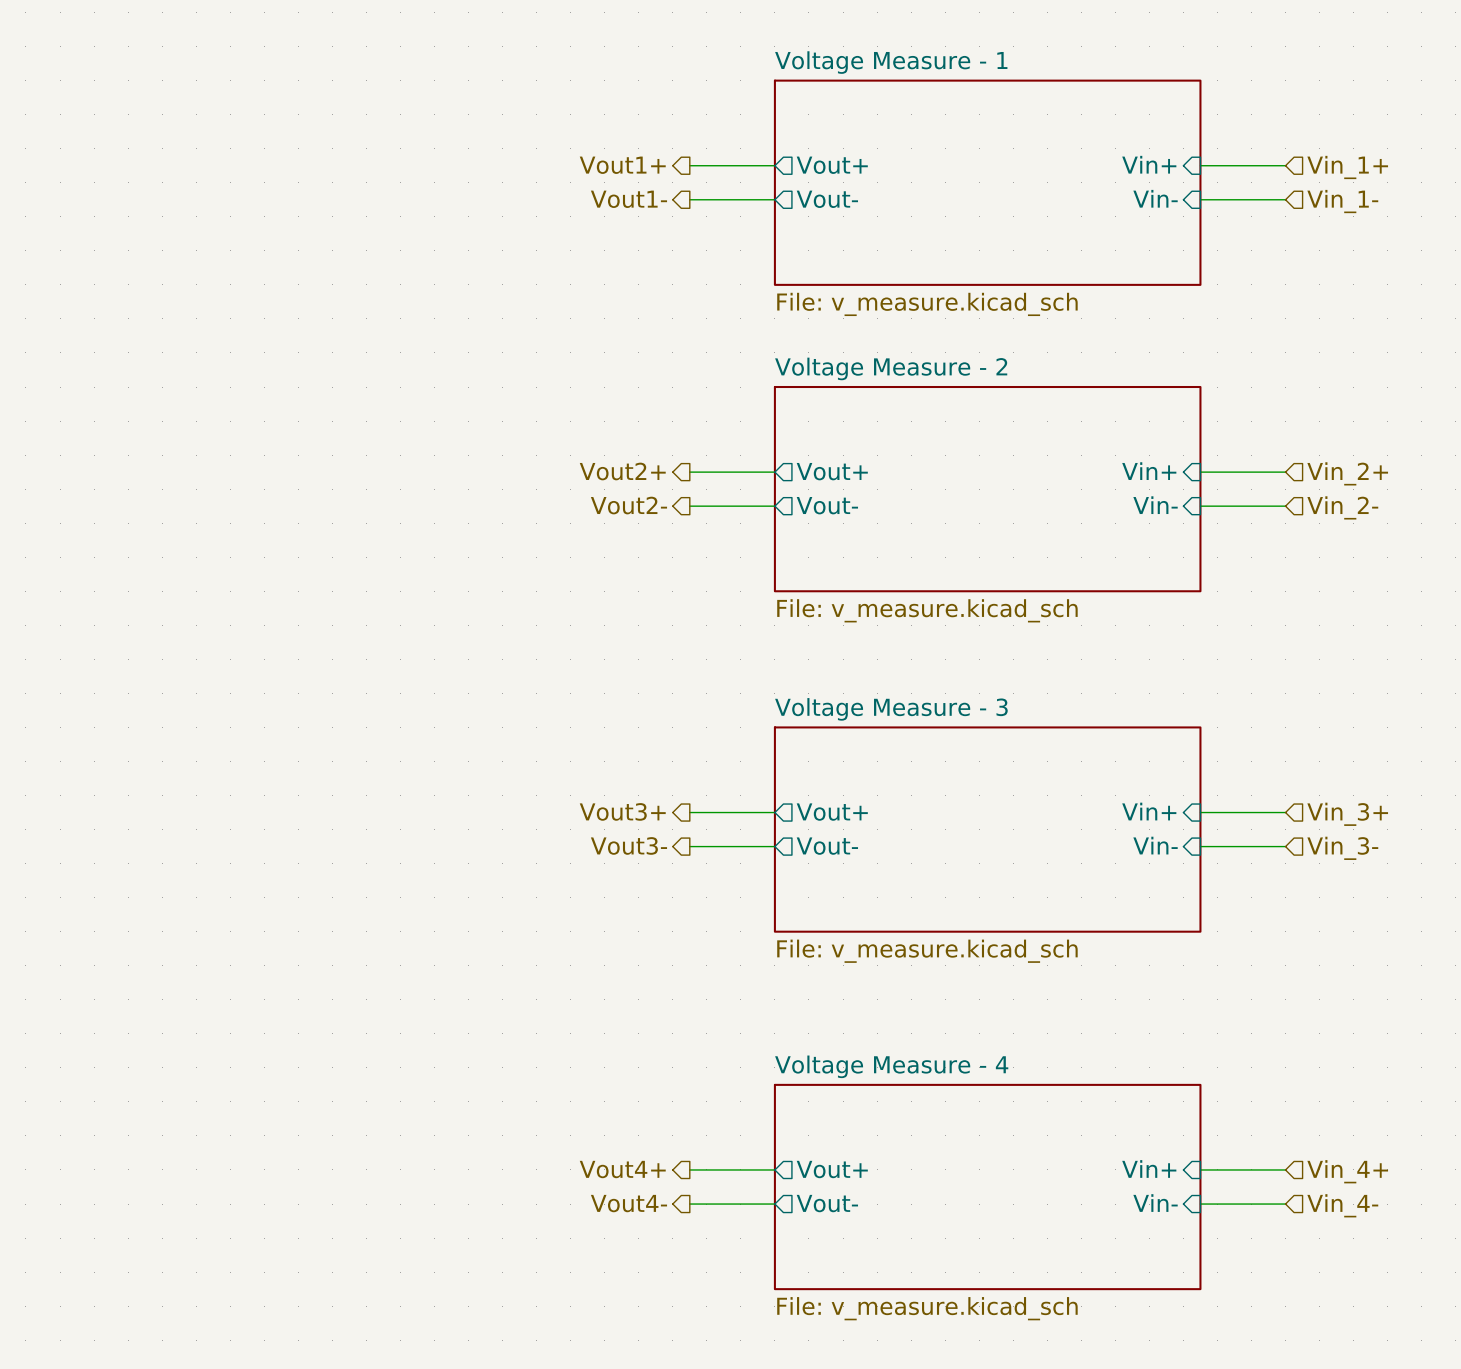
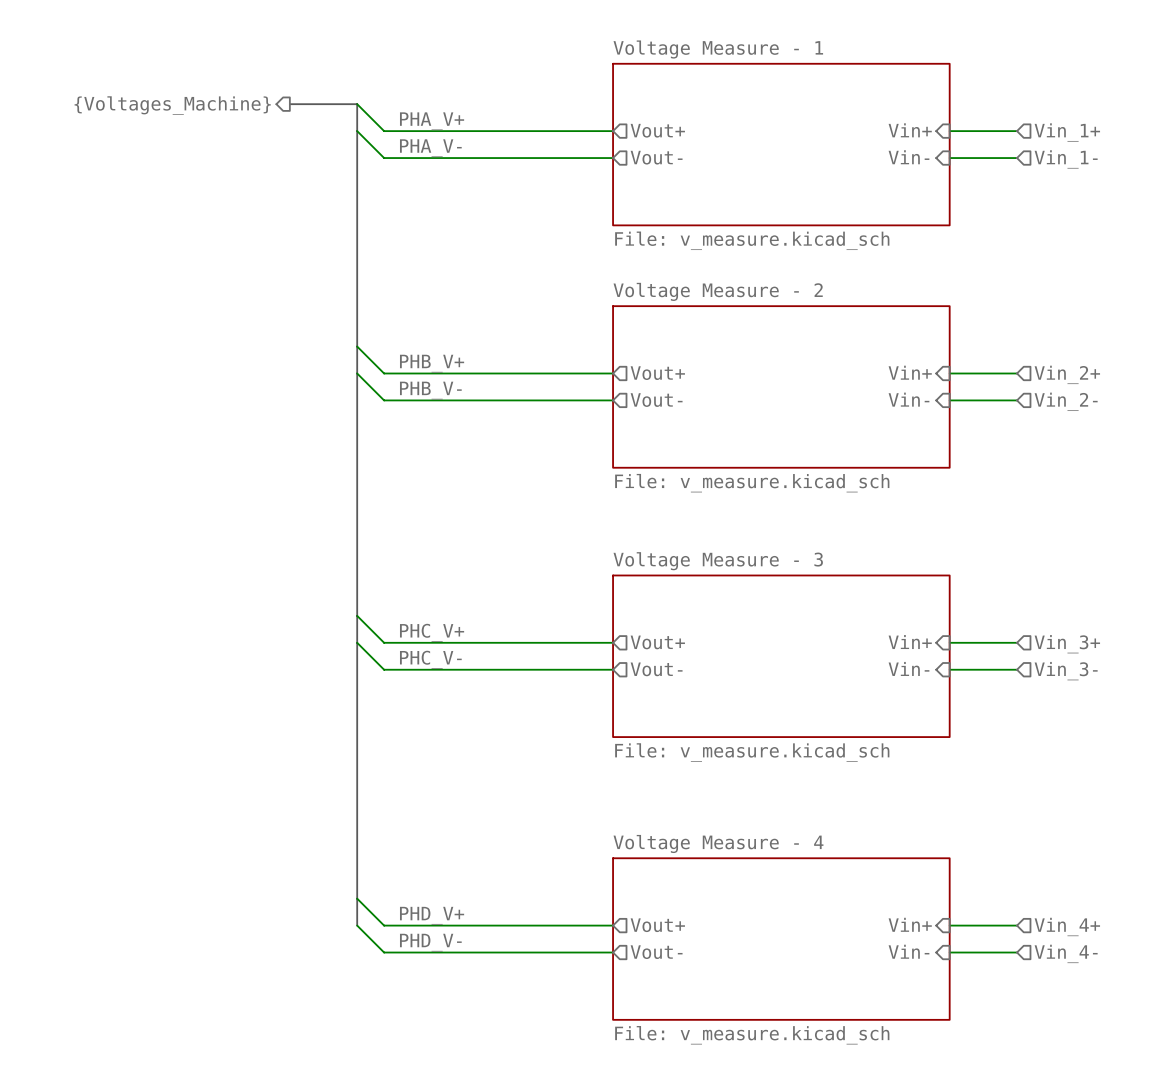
bus: none -> (289, 104) (357, 104) (357, 925)
wire: none -> (357, 104) (384, 131) (545, 131)
hierarchical label: none -> {Voltages_Machine} (172, 105)
label: none -> PHA_V+ (432, 121)
wire: none -> (357, 131) (384, 158) (545, 158)
hierarchical label: Vout1+ (622, 165) -> none
label: none -> PHA_V- (430, 148)
hierarchical label: Vout1- (628, 199) -> none
wire: none -> (357, 346) (384, 373) (545, 373)
label: none -> PHB_V+ (432, 363)
hierarchical label: Vout2+ (622, 471) -> none
wire: none -> (357, 373) (384, 400) (545, 400)
label: none -> PHB_V- (430, 390)
hierarchical label: Vout2- (628, 505) -> none
wire: none -> (357, 615) (384, 642) (545, 642)
label: none -> PHC_V+ (432, 632)
hierarchical label: Vout3+ (622, 811) -> none
wire: none -> (357, 642) (384, 669) (545, 669)
label: none -> PHC_V- (430, 659)
hierarchical label: Vout3- (628, 845) -> none
wire: none -> (357, 898) (384, 925) (545, 925)
label: none -> PHD_V+ (432, 915)
wire: none -> (357, 925) (384, 952) (545, 952)
hierarchical label: Vout4+ (622, 1169) -> none
label: none -> PHD_V- (430, 942)
hierarchical label: Vout4- (628, 1203) -> none

